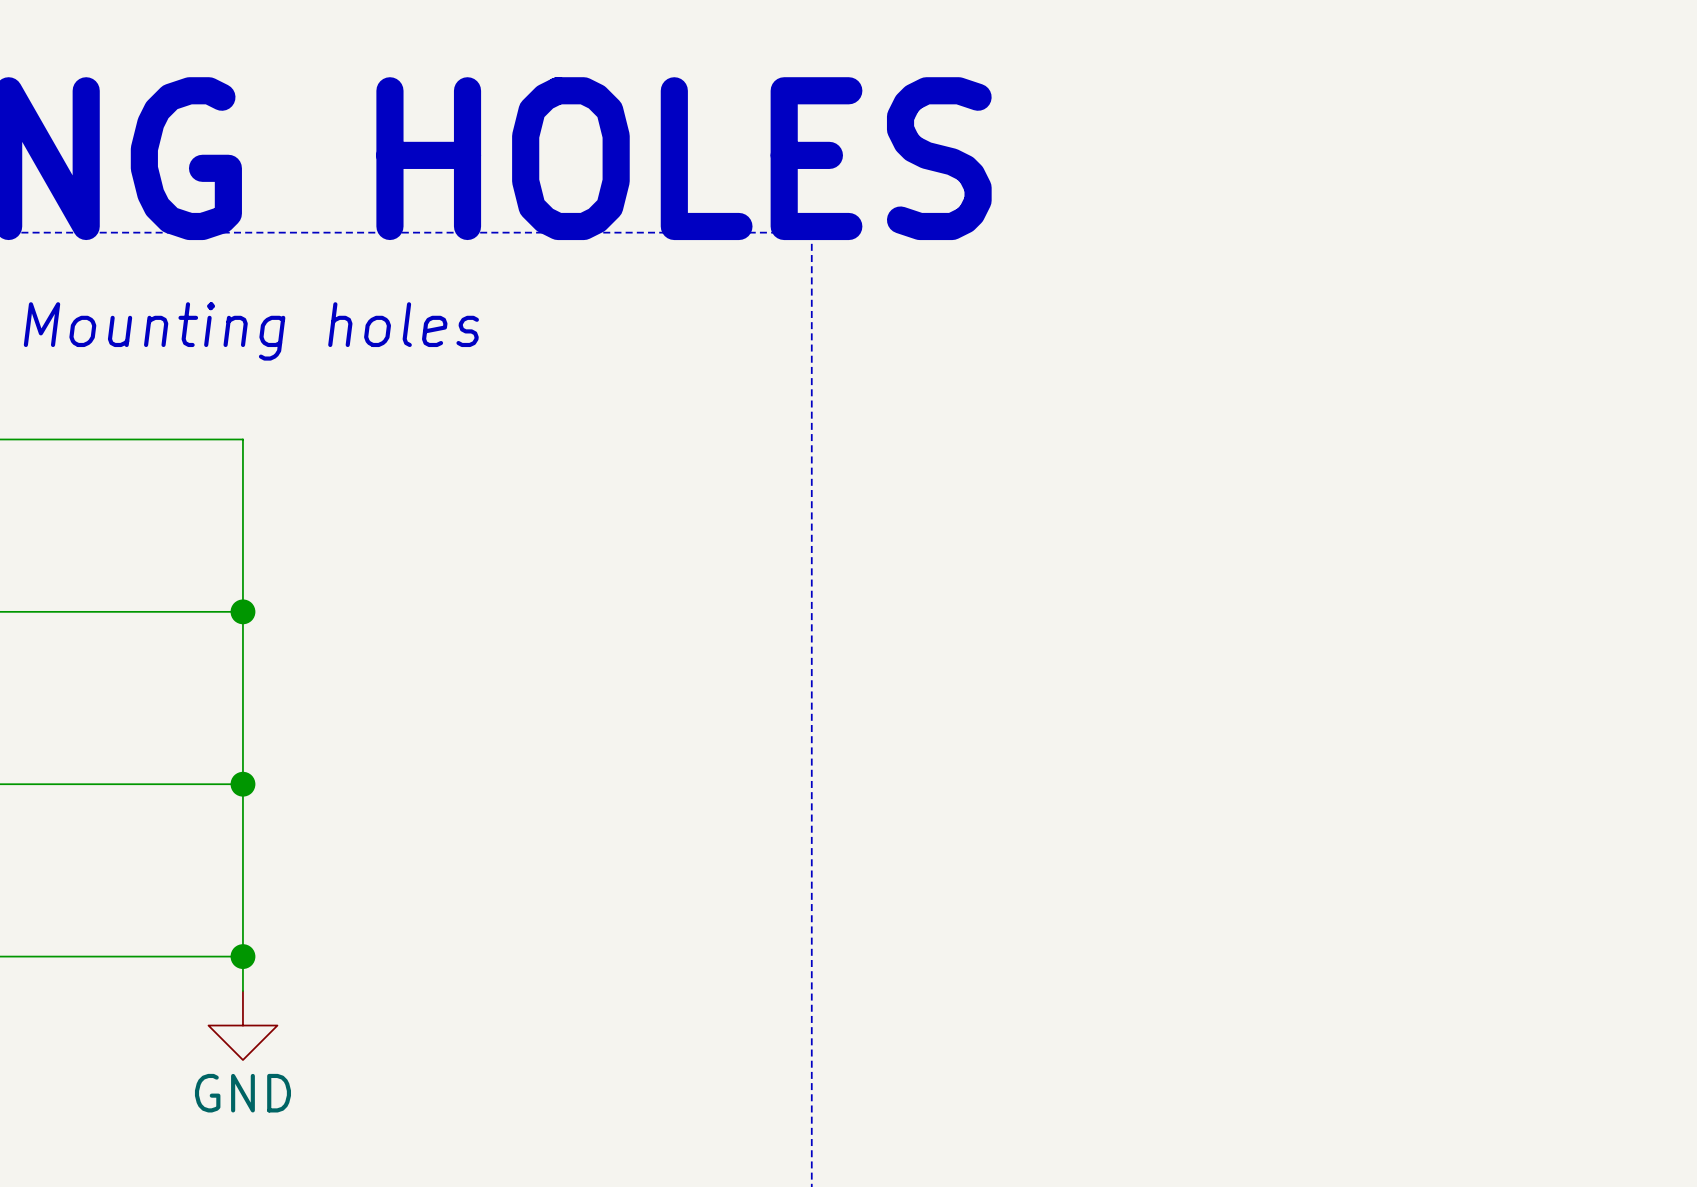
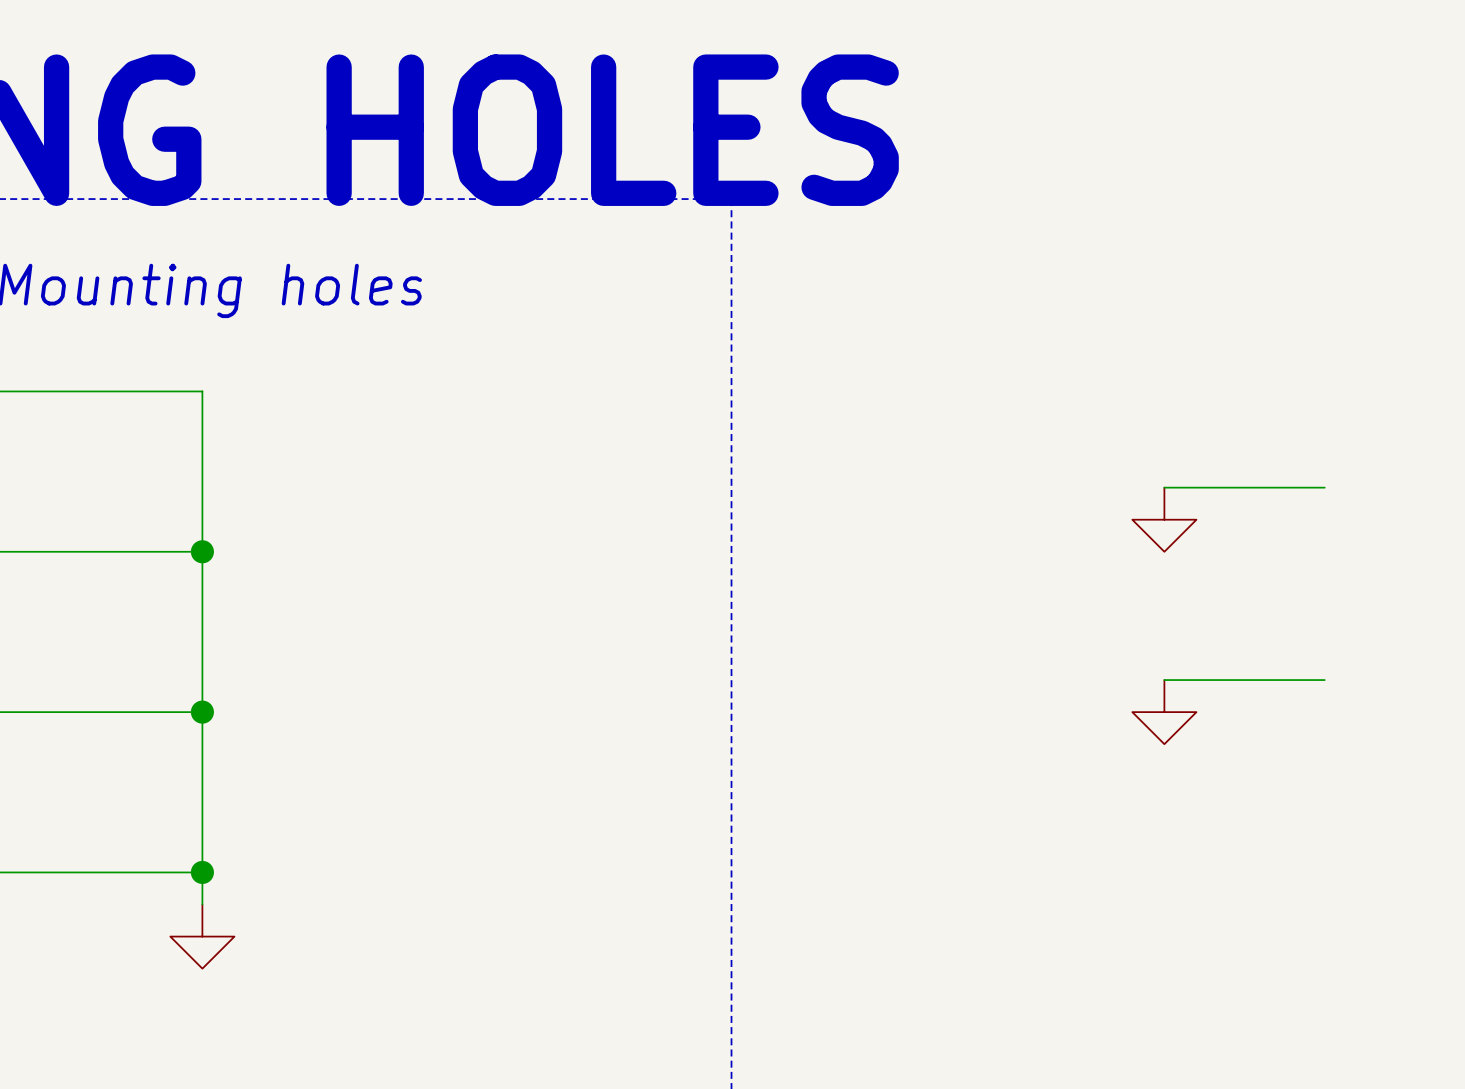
wire: none -> (1164, 487) (1324, 487)
power symbol: none -> (1164, 519)
wire: none -> (1164, 680) (1324, 680)
power symbol: none -> (1164, 712)
power symbol text: GND (242, 1093) -> none

